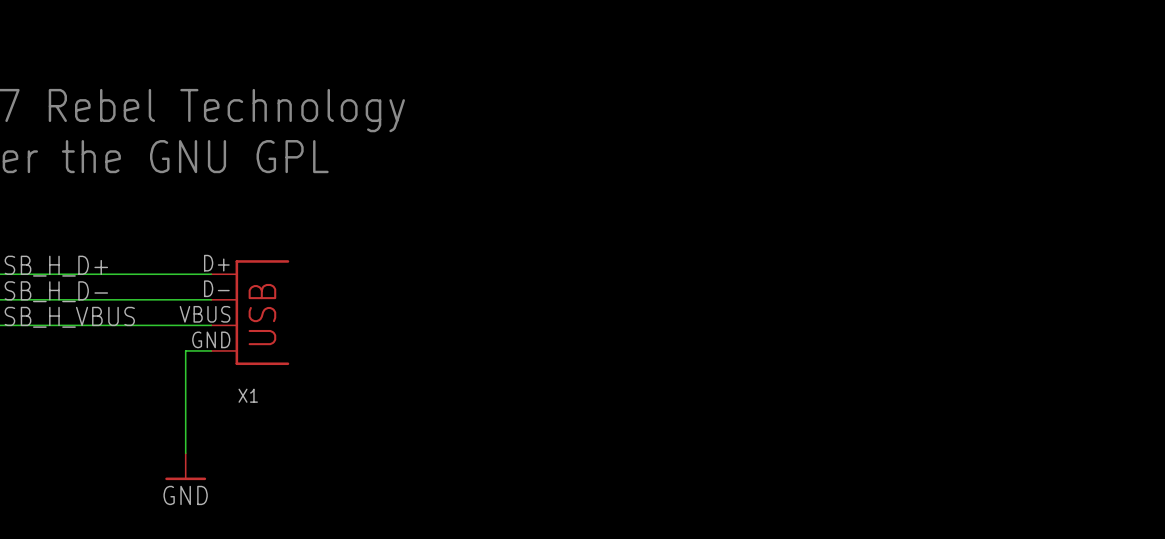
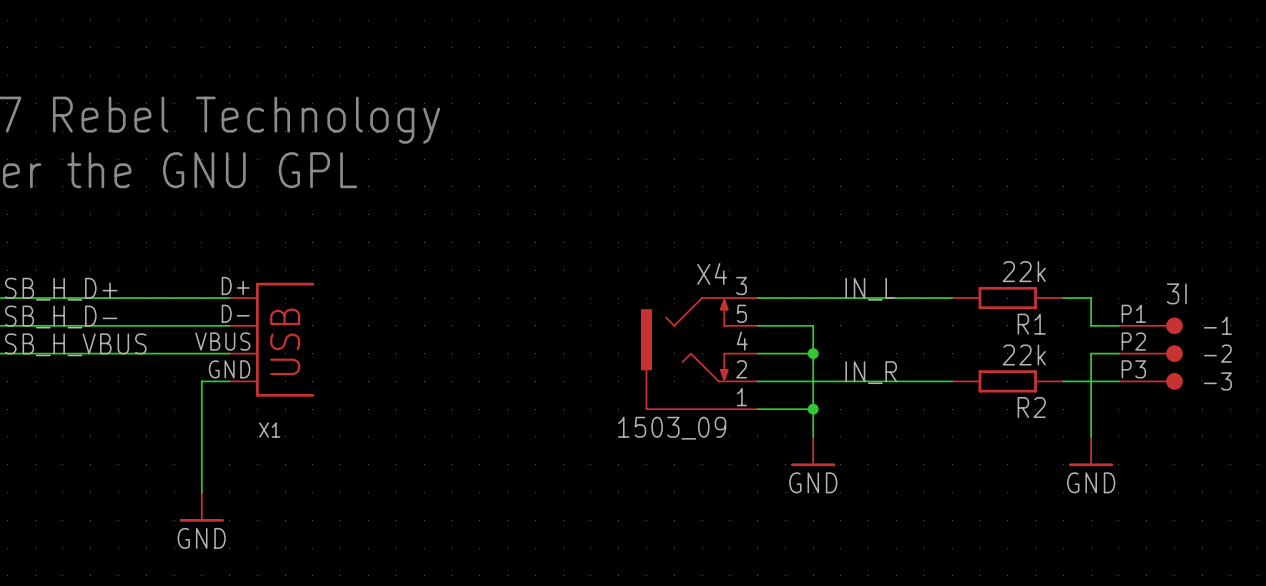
label: none -> IN_L (870, 289)
wire: none -> (757, 298) (952, 298)
R1: none -> 22k (1007, 298)
wire: none -> (1063, 298) (1091, 298) (1091, 325) (1118, 325)
wire: none -> (757, 325) (813, 325) (813, 436)
X4: none -> 1503_09 (699, 353)
wire: none -> (757, 353) (813, 353)
junction: none -> (813, 353)
wire: none -> (1118, 353) (1091, 353) (1091, 436)
3I: none -> (1150, 353)
label: none -> IN_R (871, 372)
wire: none -> (757, 381) (952, 381)
R2: none -> 22k (1007, 381)
wire: none -> (1063, 381) (1118, 381)
wire: none -> (757, 409) (813, 409)
junction: none -> (813, 409)
power symbol: none -> GND (813, 451)
power symbol: none -> GND (1091, 451)

